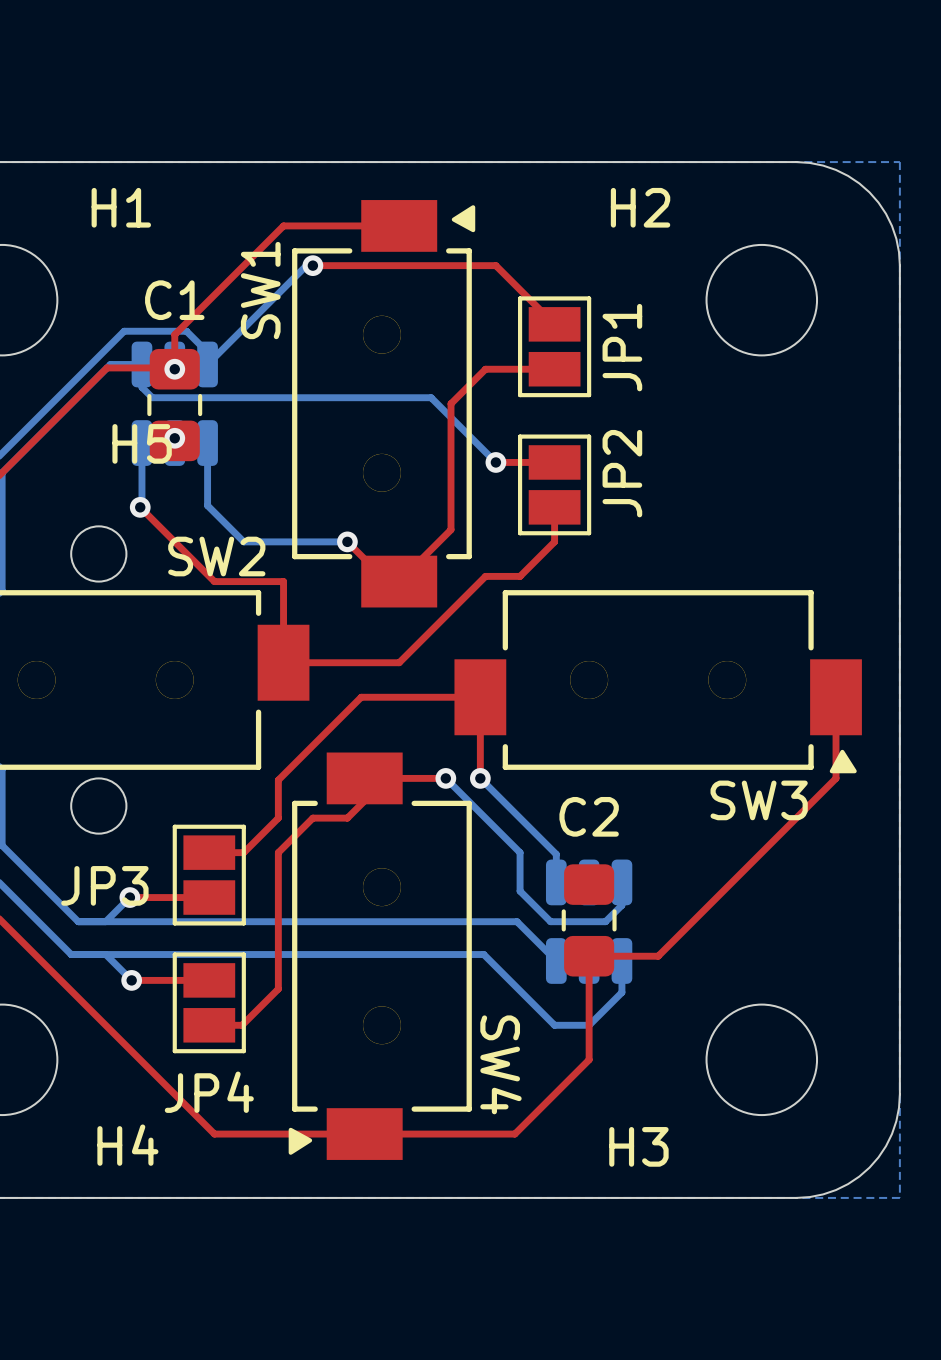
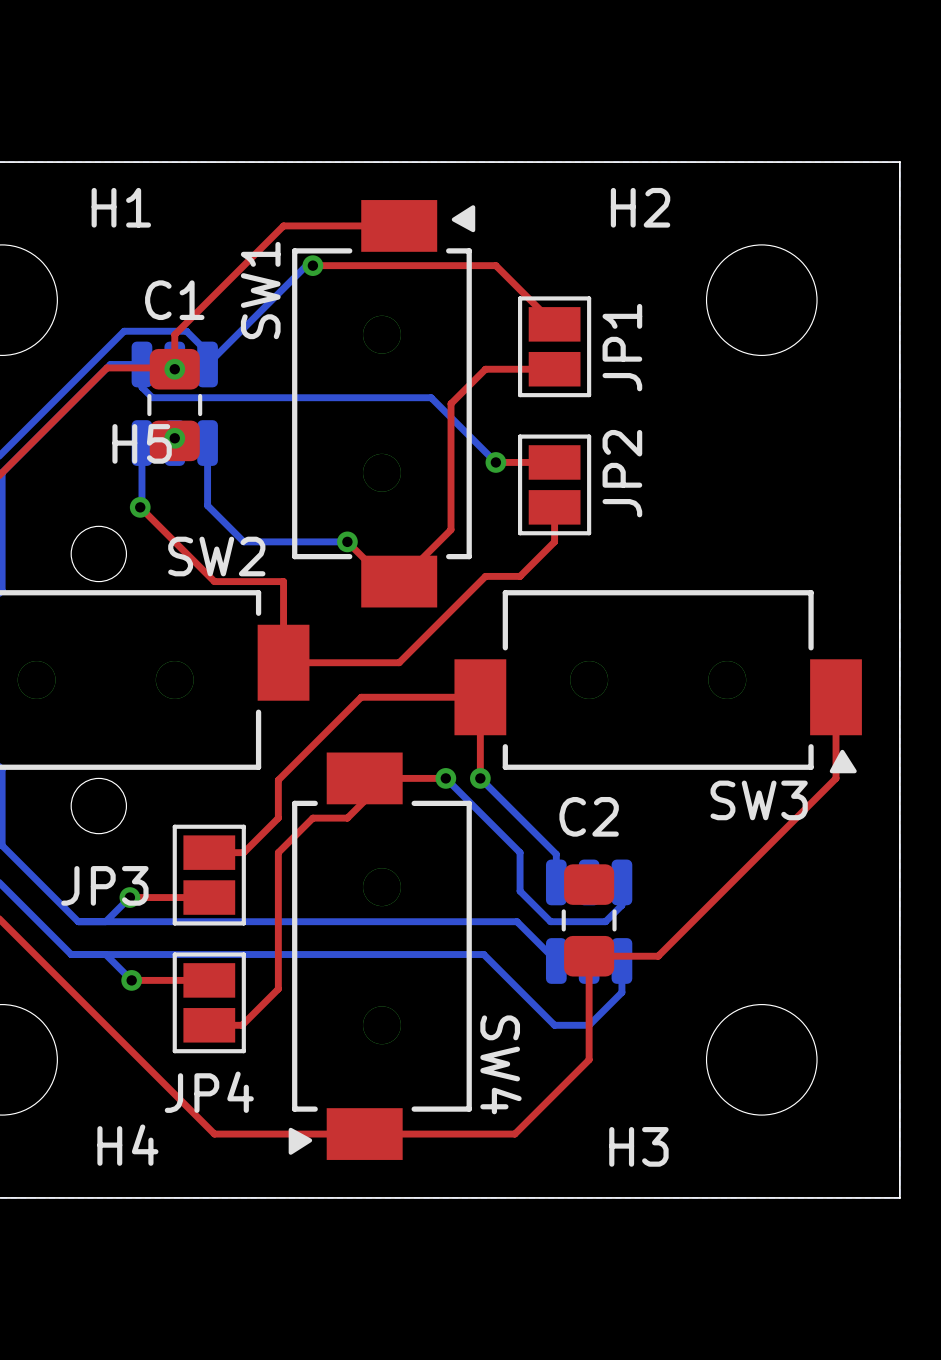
board edge: (796, 162) (809, 162) (835, 169) (859, 183) (869, 192) (886, 213) (892, 226) (896, 238) (899, 265) -> (796, 162) (899, 162) (899, 265)
board edge: (899, 1094) (896, 1121) (892, 1133) (886, 1146) (869, 1167) (859, 1176) (835, 1190) (823, 1194) (796, 1197) -> (899, 1094) (899, 1197) (796, 1197)

